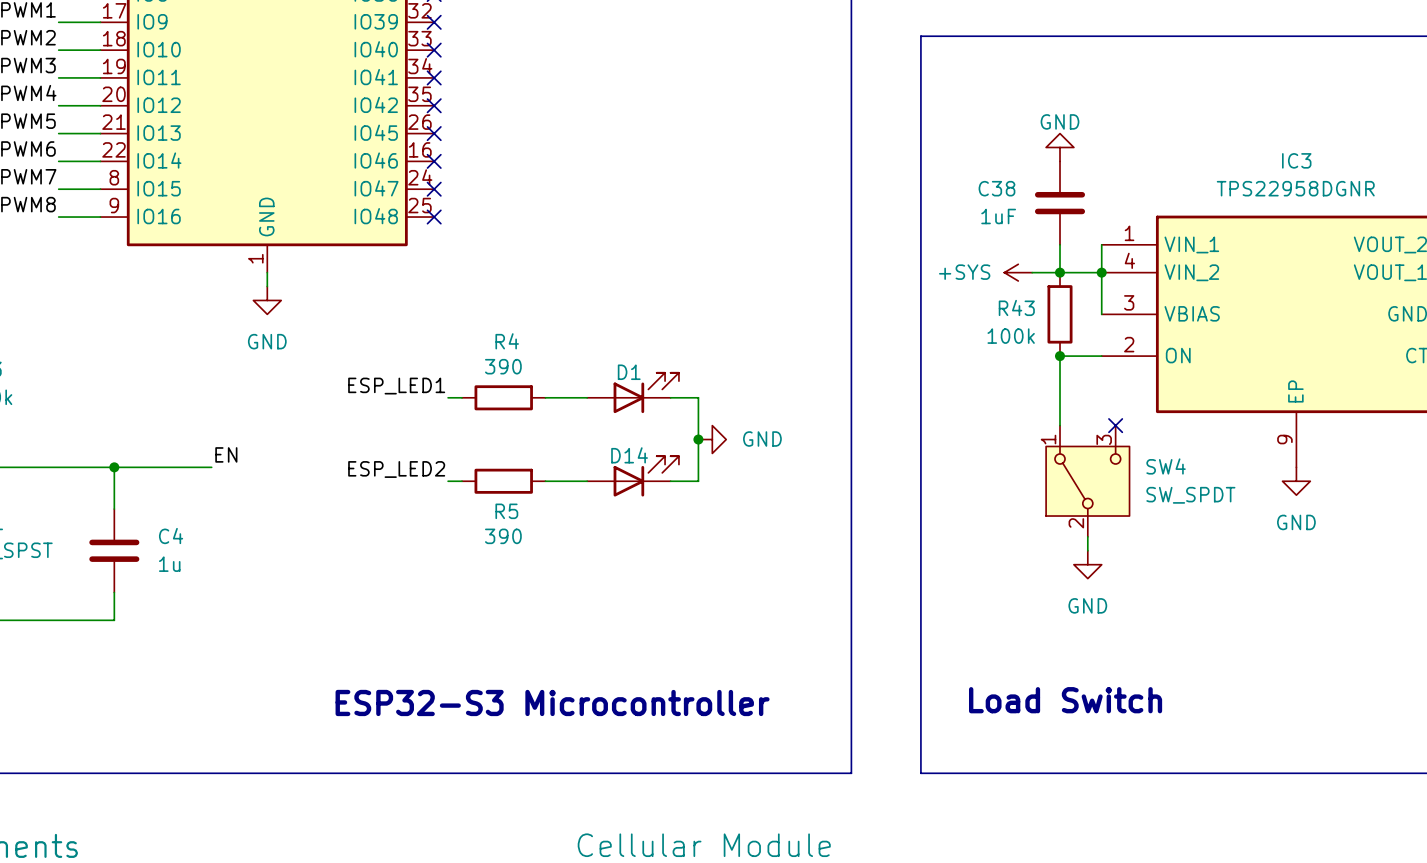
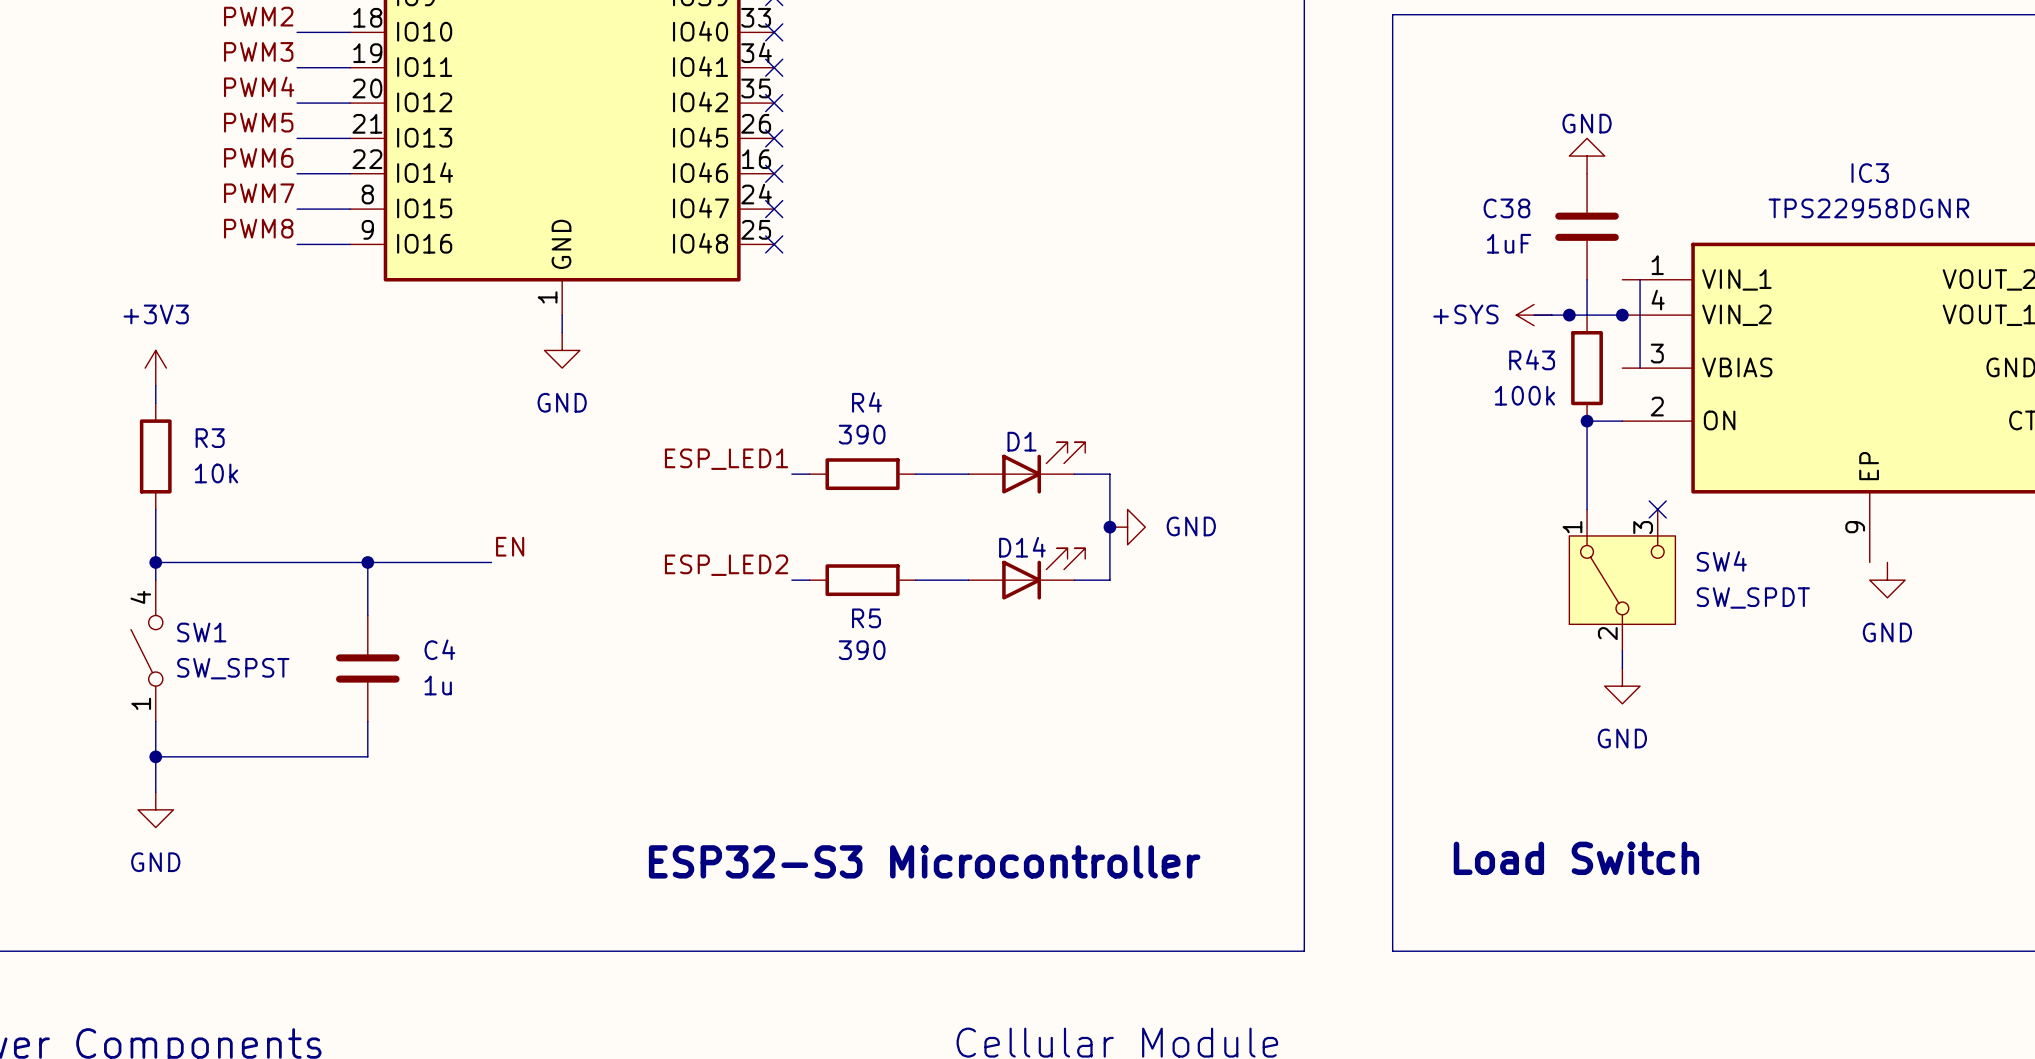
power symbol position: GND (1060, 147) -> GND (1587, 156)
C38 position: (1060, 203) -> (1587, 226)
wire: (1060, 244) (1060, 272) -> (1587, 279) (1587, 315)
wire: (1101, 244) (1101, 314) -> (1640, 279) (1640, 368)
power symbol position: +SYS (1018, 272) -> +SYS (1534, 315)
R43 position: (1060, 314) -> (1587, 368)
junction position: (1060, 356) -> (1587, 421)
wire: (1073, 356) (1060, 356) (1060, 425) -> (1587, 421) (1587, 509)
no-connect mark position: (1115, 425) -> (1657, 509)
SW4 position: (1087, 481) -> (1622, 580)
power symbol position: GND (1296, 481) -> GND (1887, 580)
wire: (1087, 536) (1087, 550) -> (1622, 650) (1622, 668)
power symbol position: GND (1087, 564) -> GND (1622, 686)

